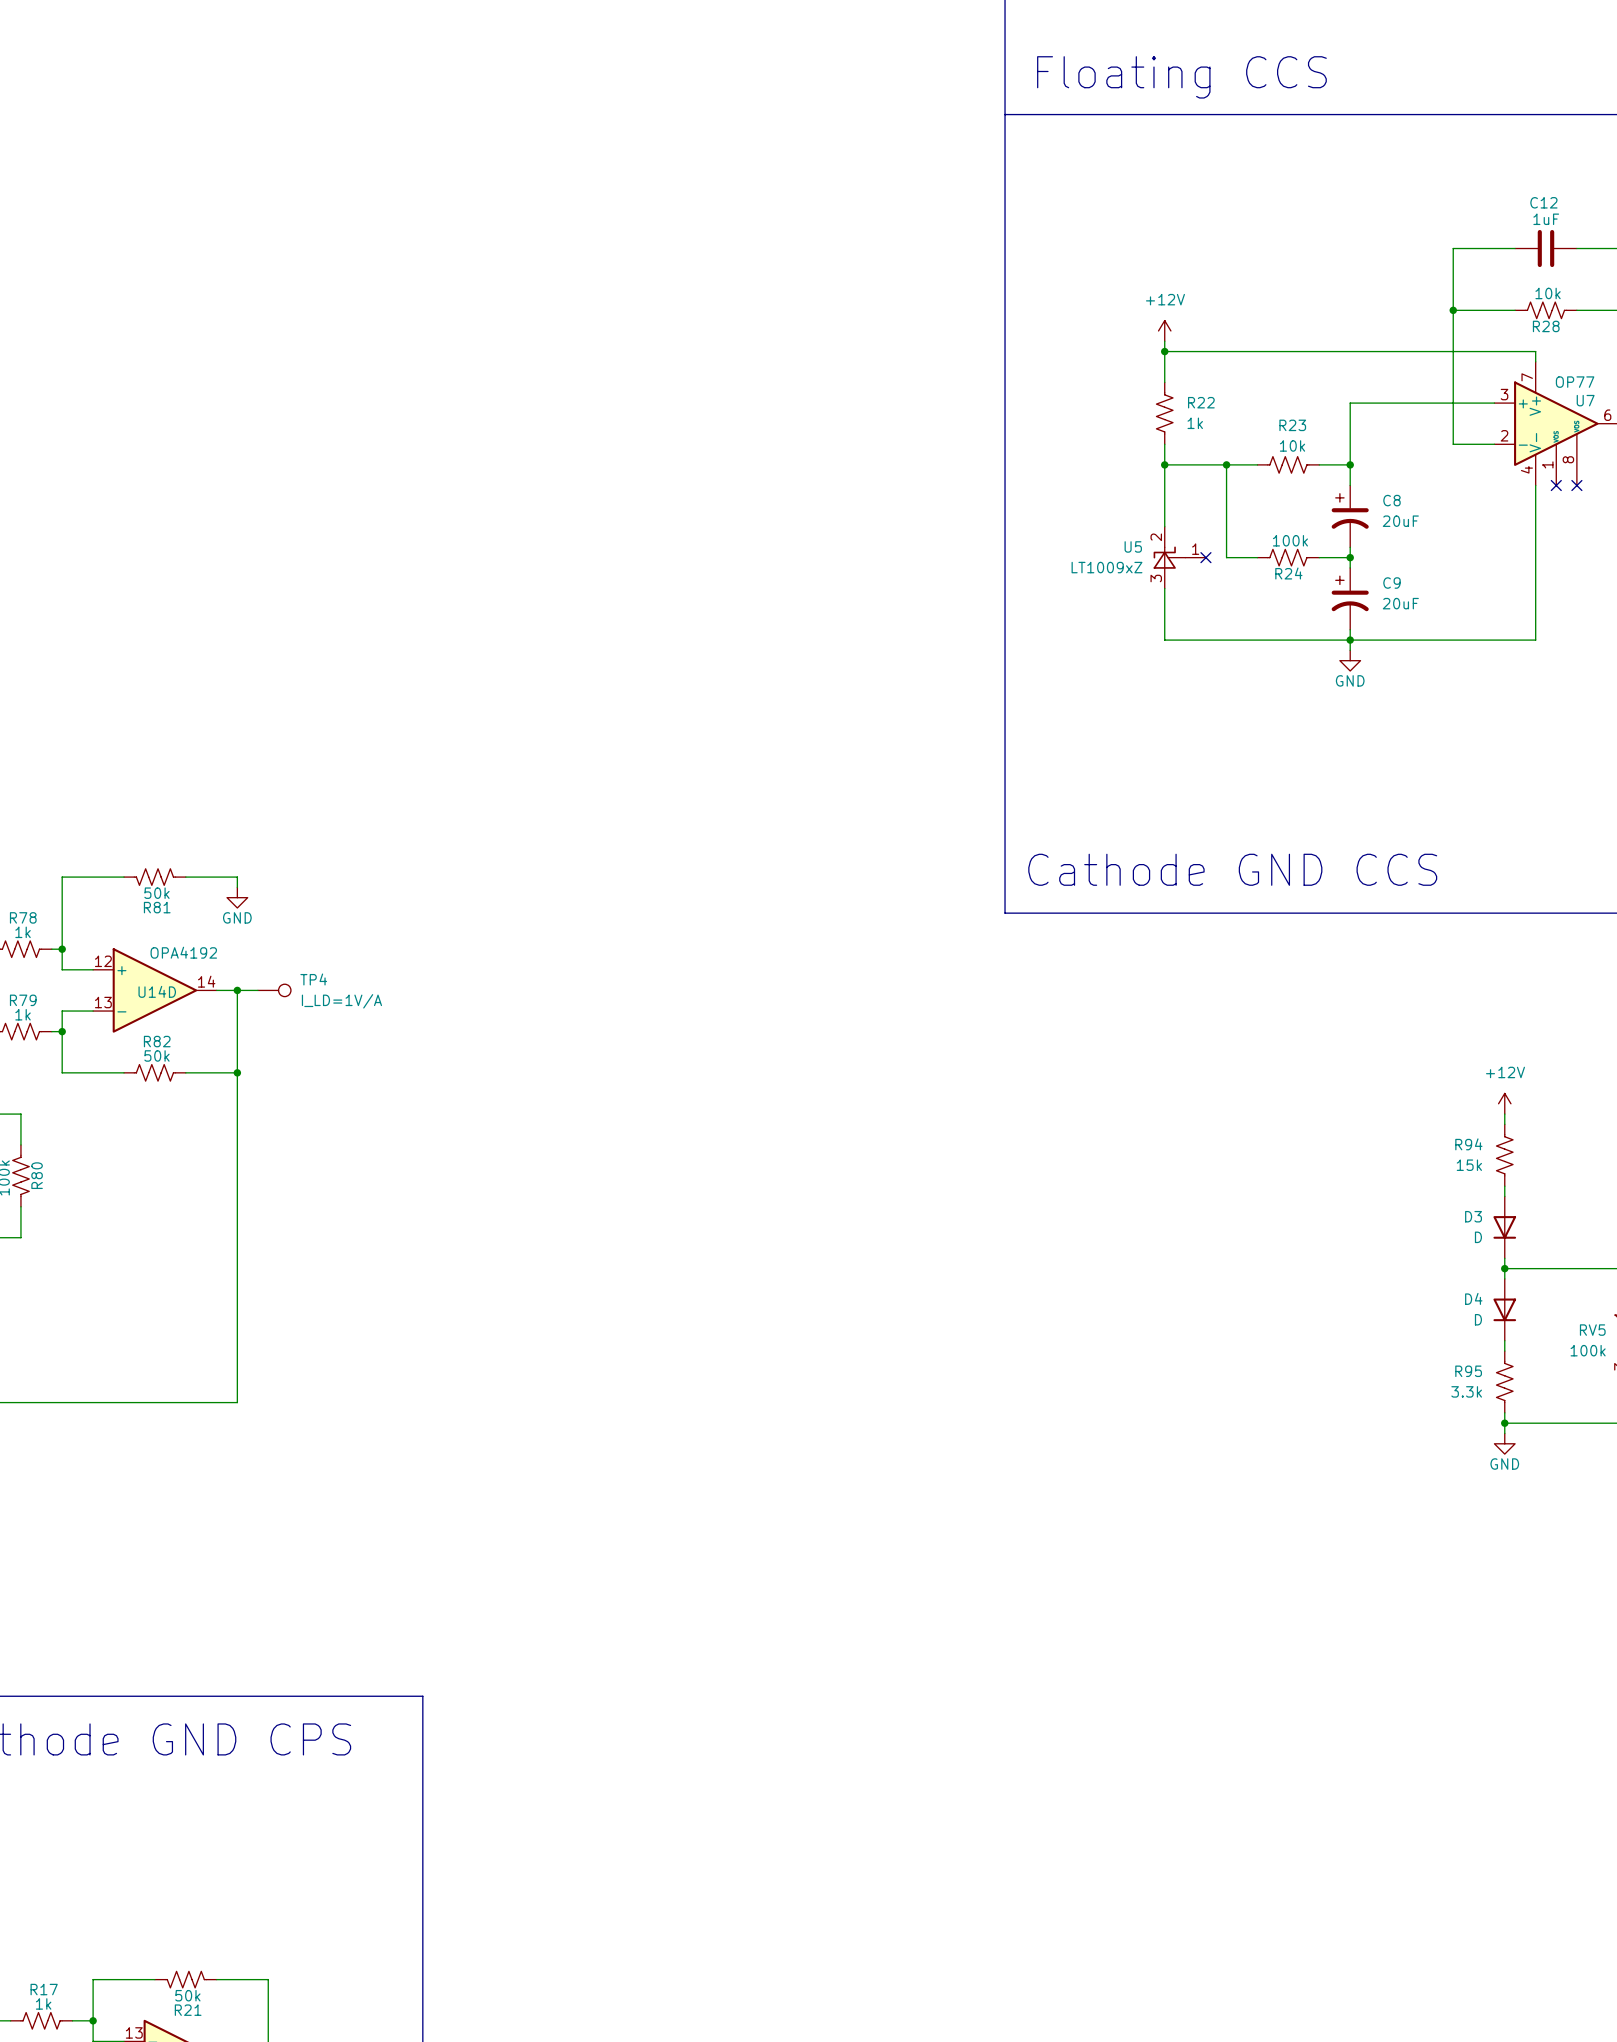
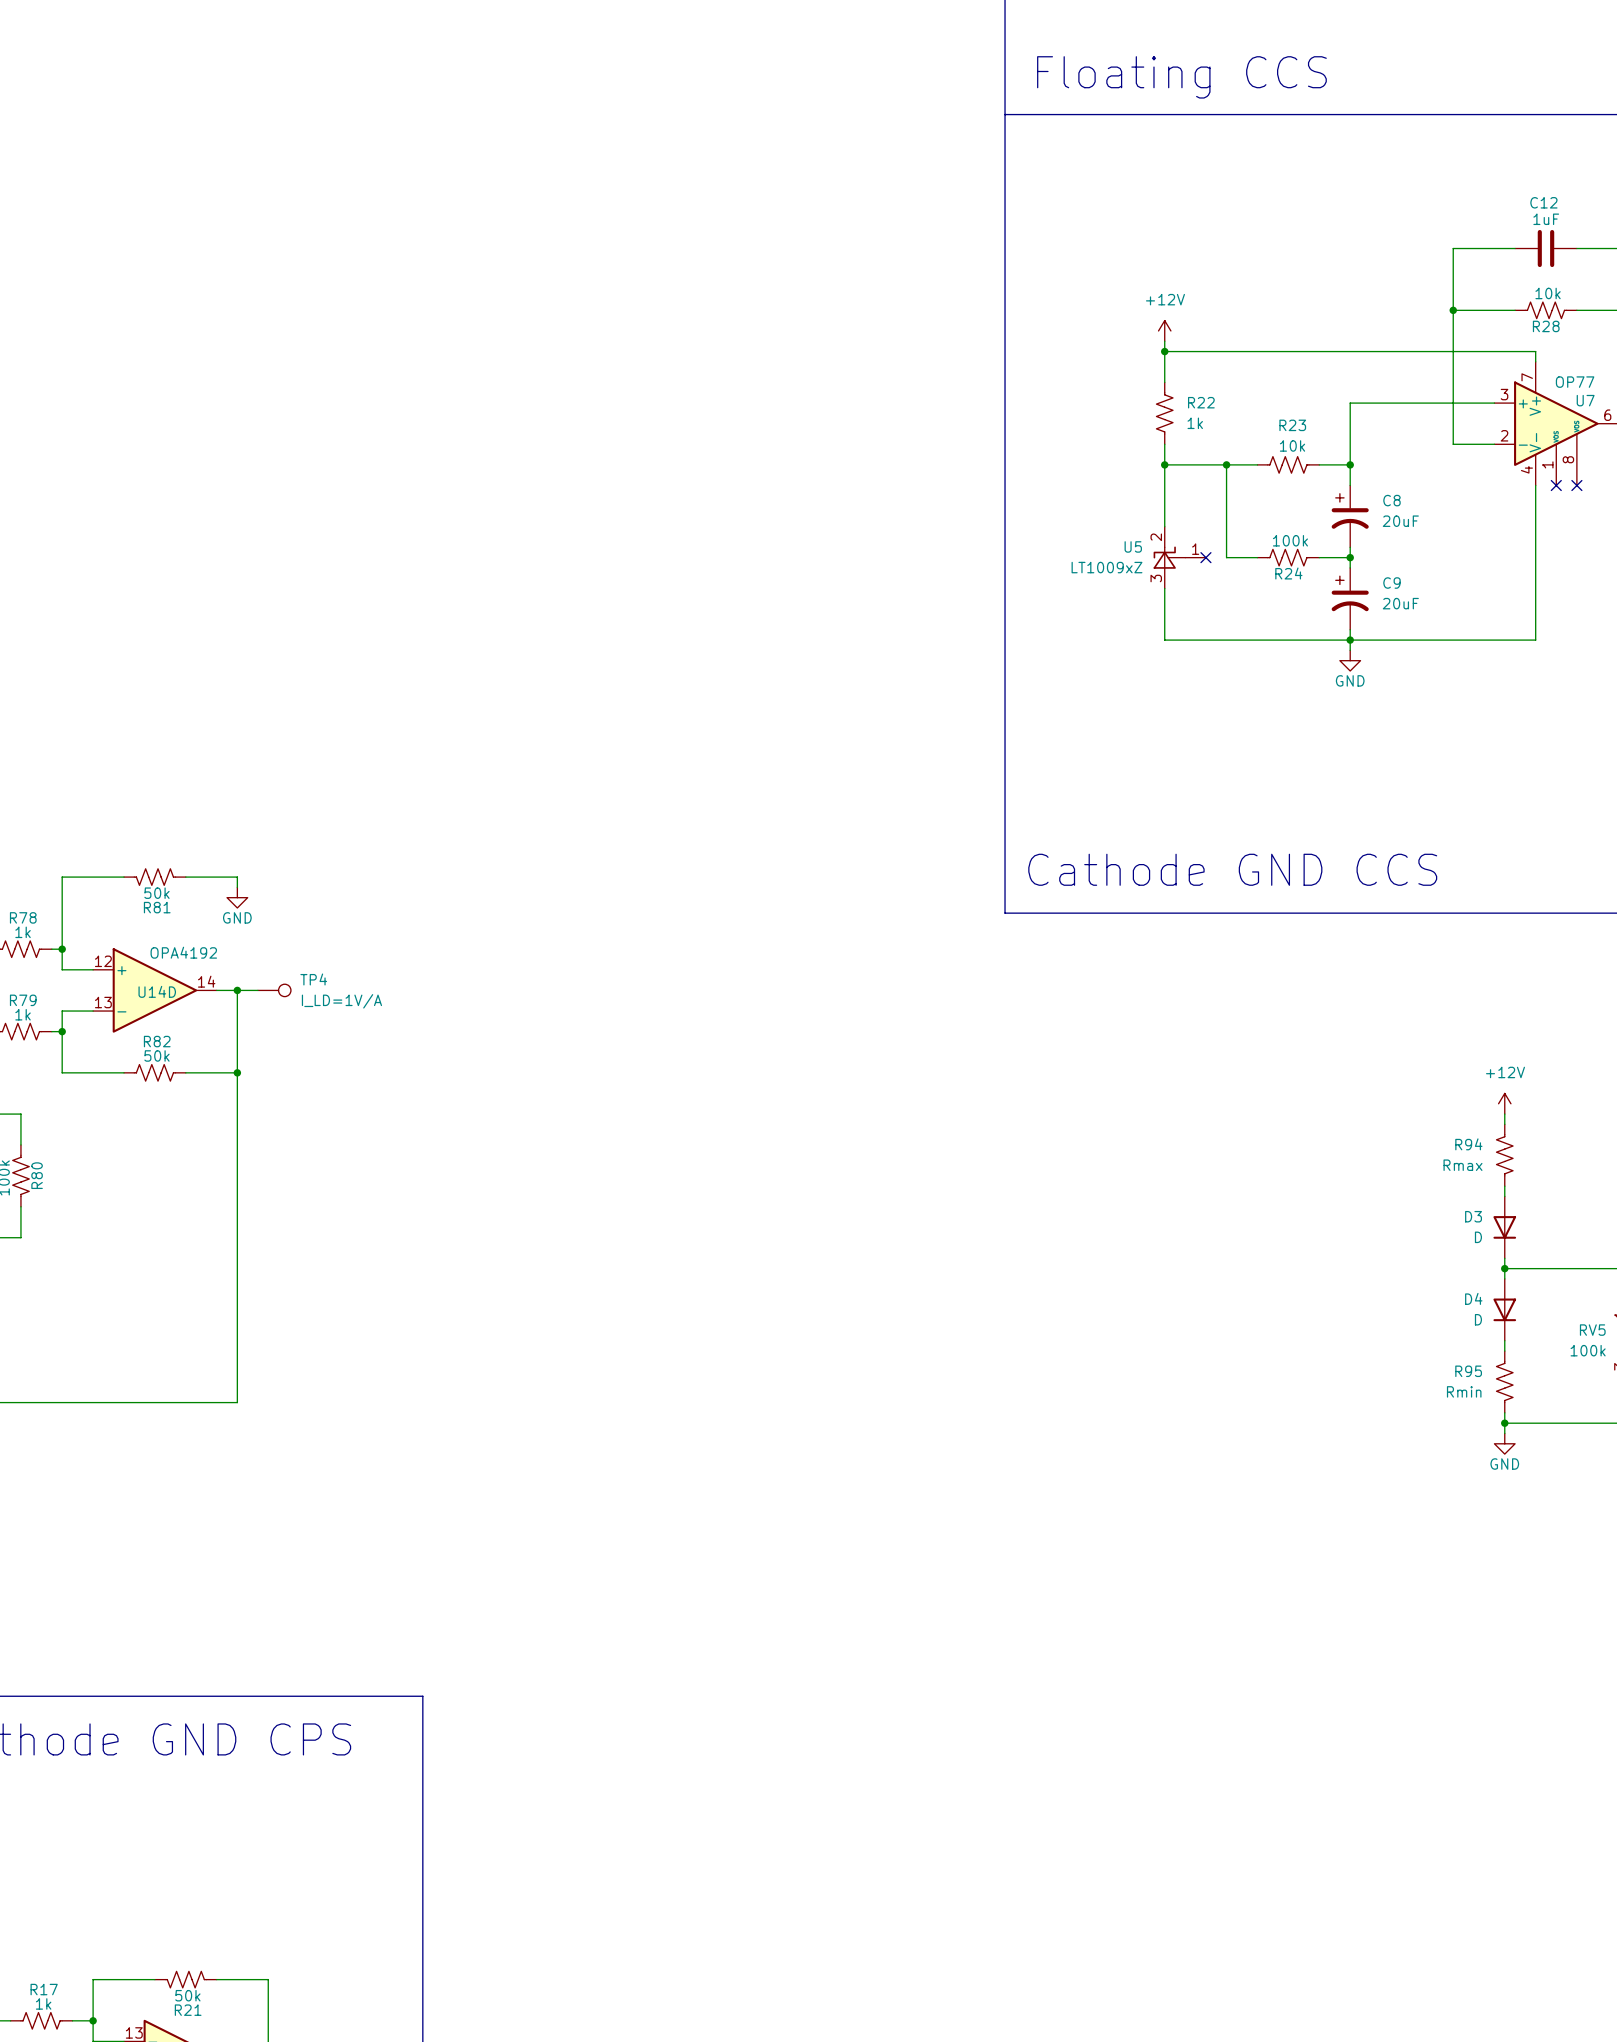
R94 flip: as is (1504, 1155) -> left-right (1504, 1155)
R94 value: 15k (1469, 1165) -> Rmax (1462, 1165)
R95 flip: as is (1504, 1381) -> left-right (1504, 1381)
R95 value: 3.3k (1466, 1391) -> Rmin (1464, 1391)

